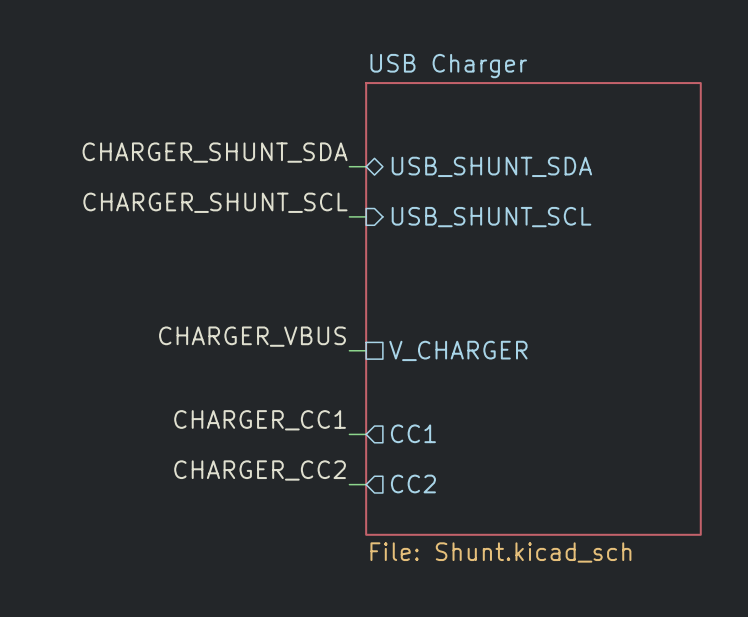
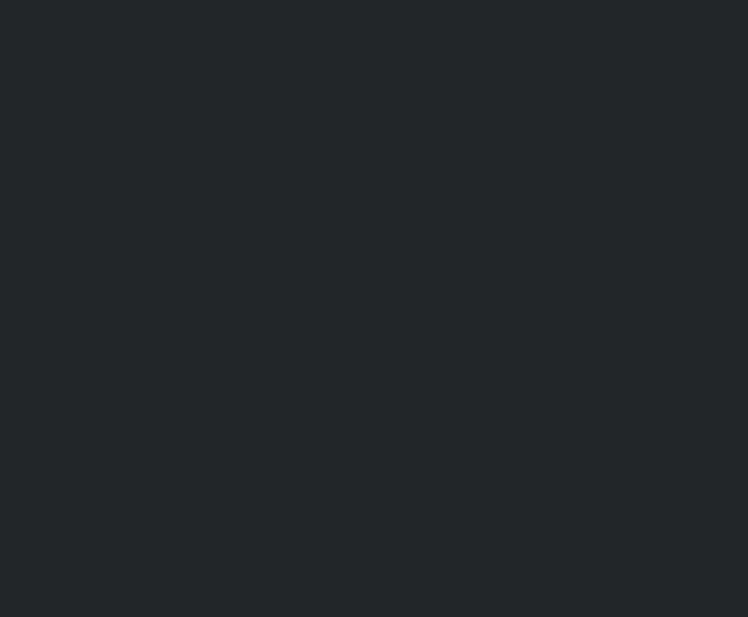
label: CHARGER_SHUNT_SDA (215, 152) -> none
wire: (349, 166) (366, 166) -> none
sheet pin: USB_SHUNT_SDA (491, 166) -> none
label: CHARGER_SHUNT_SCL (215, 202) -> none
wire: (349, 216) (366, 216) -> none
sheet pin: USB_SHUNT_SCL (491, 217) -> none
sheet USB Charger: File: Shunt.kicad_sch (533, 308) -> none
label: CHARGER_VBUS (252, 336) -> none
wire: (349, 350) (366, 350) -> none
sheet pin: V_CHARGER (458, 350) -> none
label: CHARGER_CC1 (260, 420) -> none
sheet pin: CC1 (413, 433) -> none
wire: (349, 434) (366, 434) -> none
label: CHARGER_CC2 (260, 470) -> none
sheet pin: CC2 (413, 483) -> none
wire: (349, 484) (366, 484) -> none

